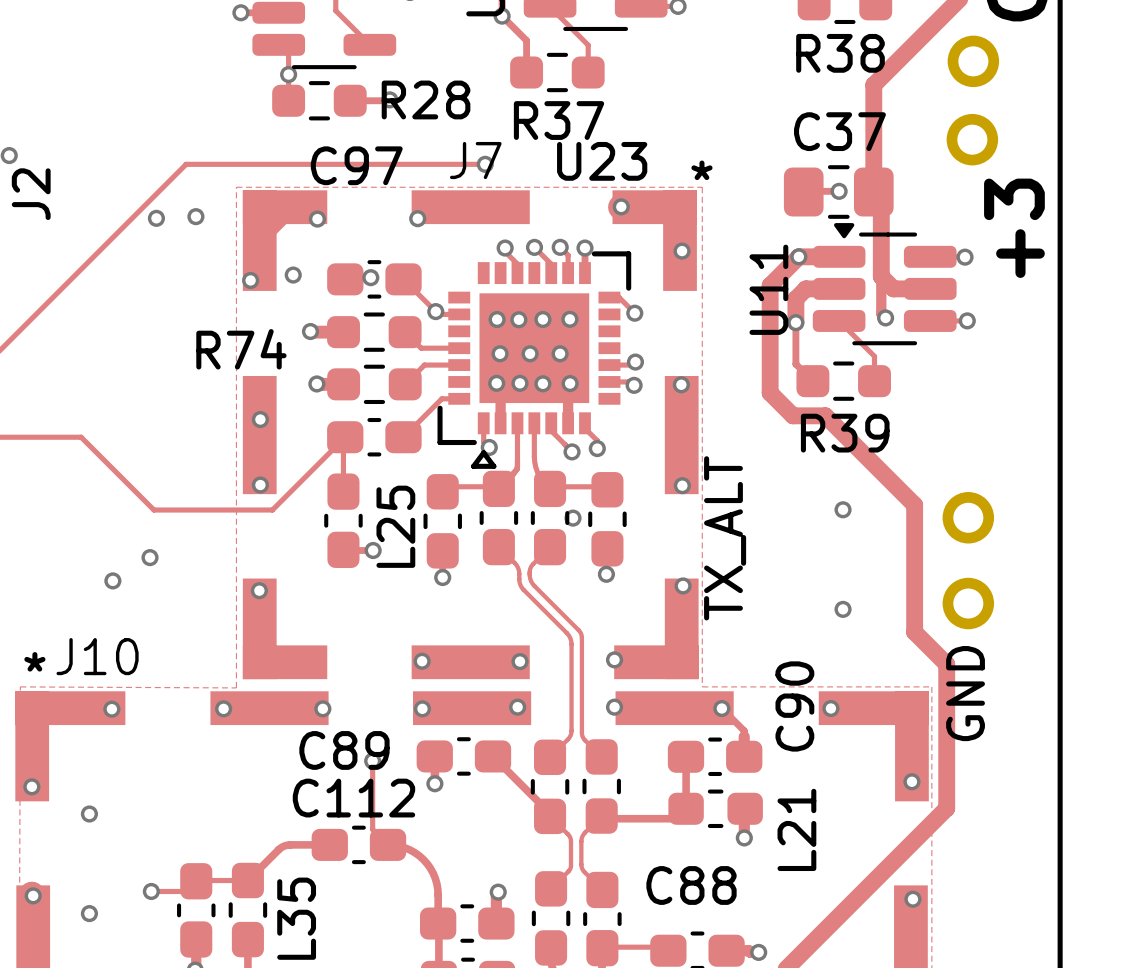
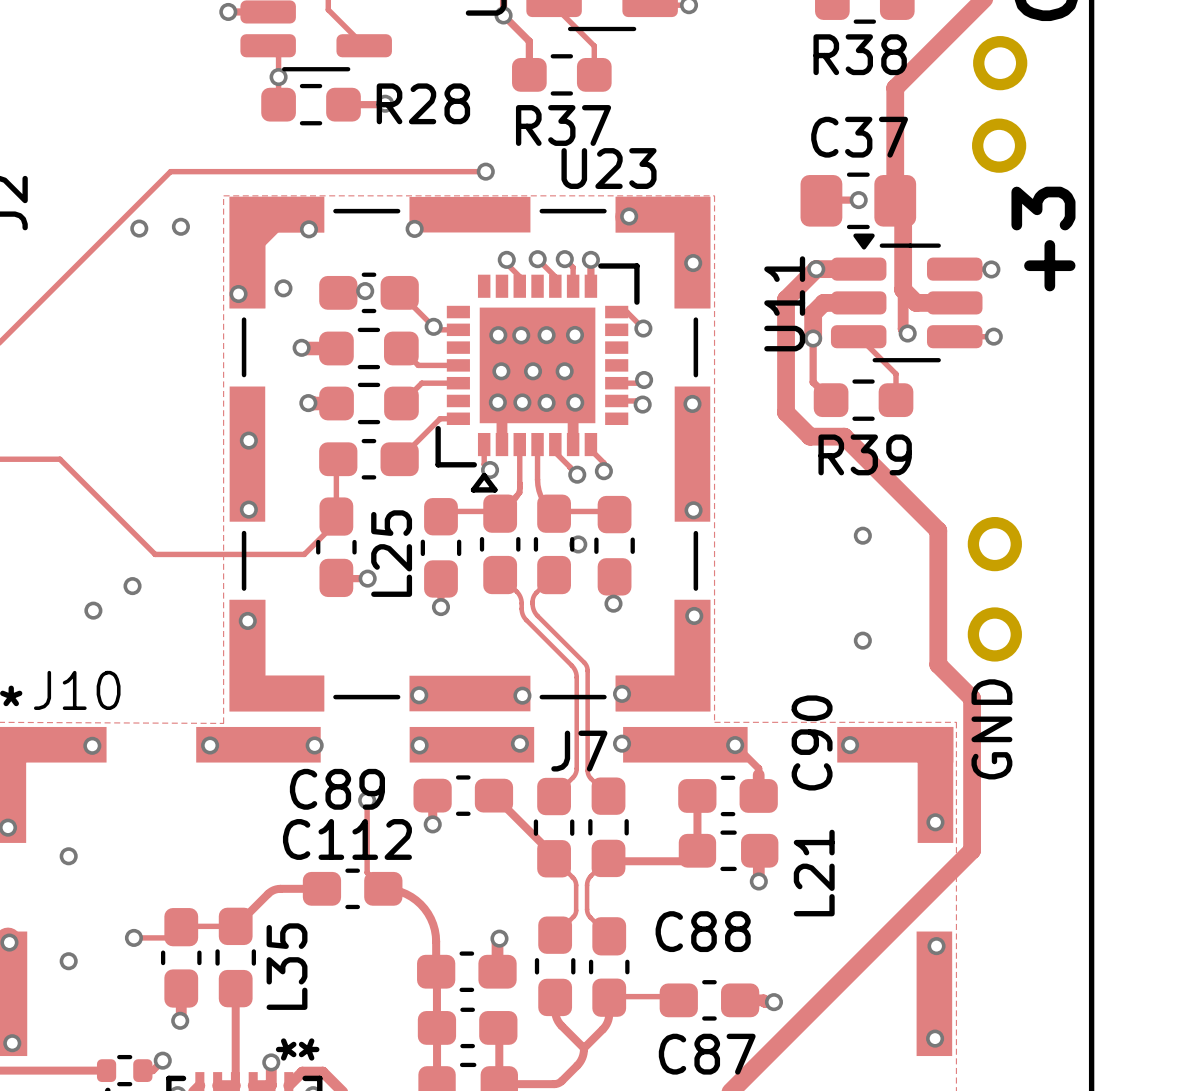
J7 name position: J7 (475, 160) -> J7 (579, 751)
C97 name: C97 (356, 165) -> none
J7 footprint: [242, 190, 699, 680] -> [229, 196, 711, 712]
R74 name: R74 (241, 349) -> none
track: (345, 437) (272, 510) (153, 510) -> (336, 516) (336, 522) (304, 554) (155, 554) (136, 535)
text: TX_ALT (725, 538) -> none

